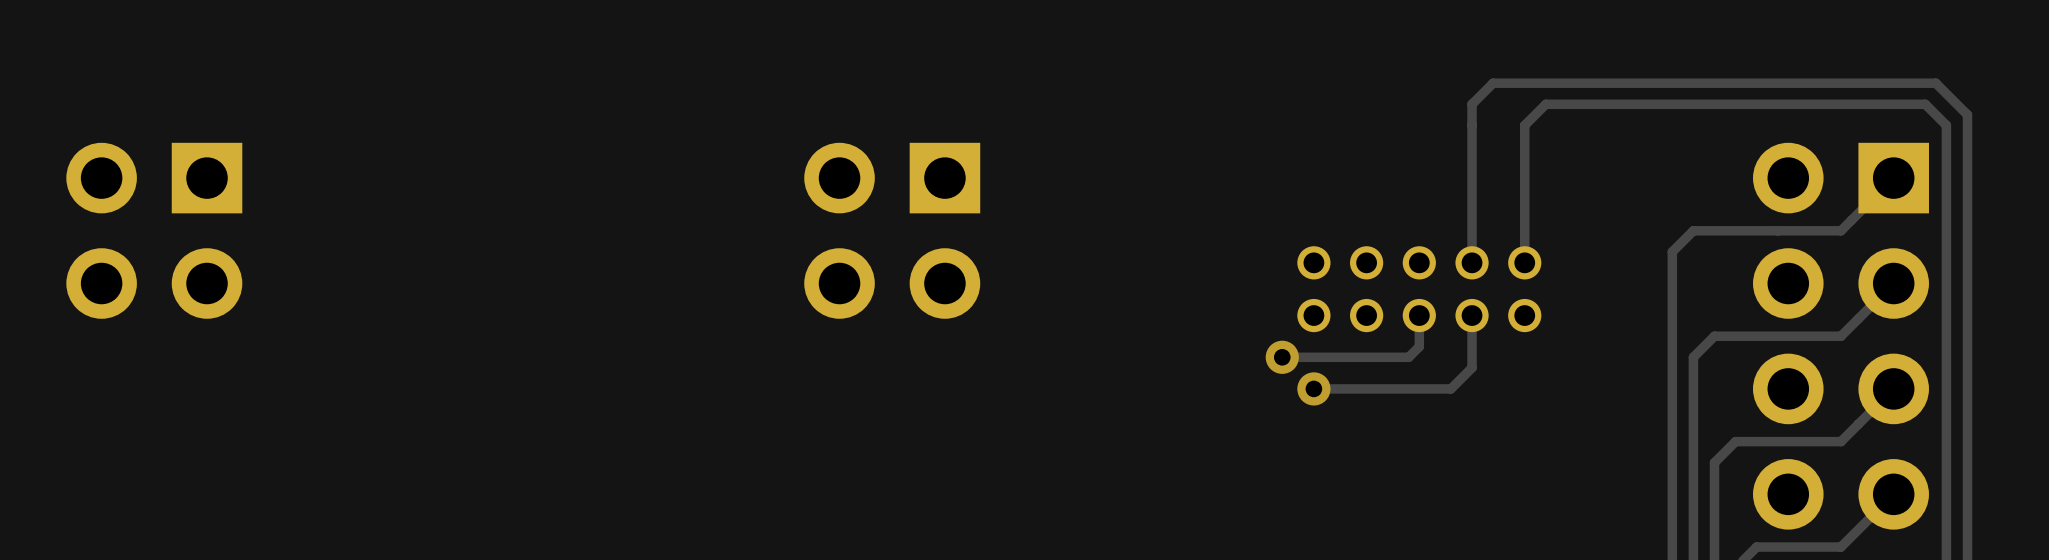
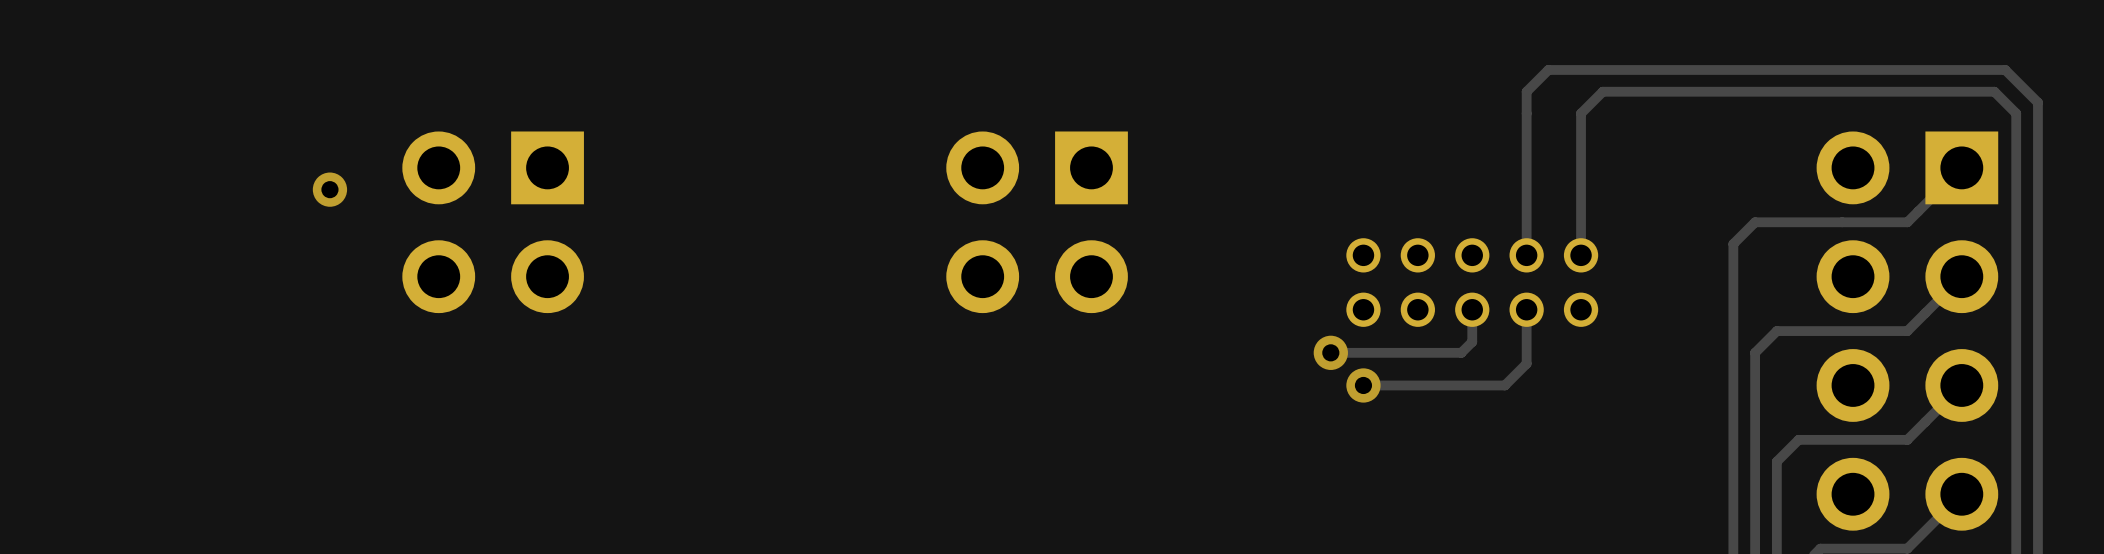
via: none -> (329, 189)
part: (154, 230) -> none
part: none -> (493, 222)
part position: (892, 230) -> (1037, 222)

